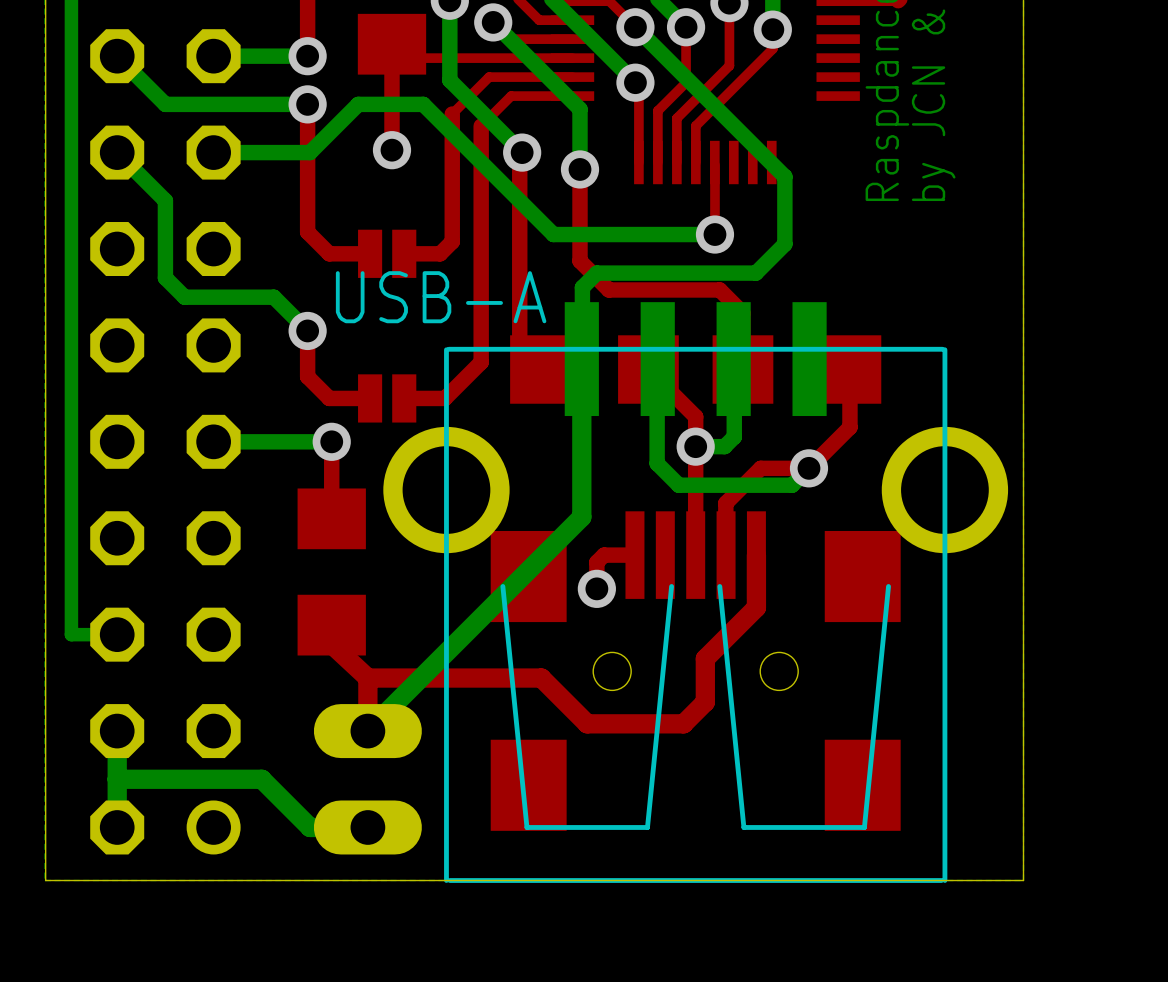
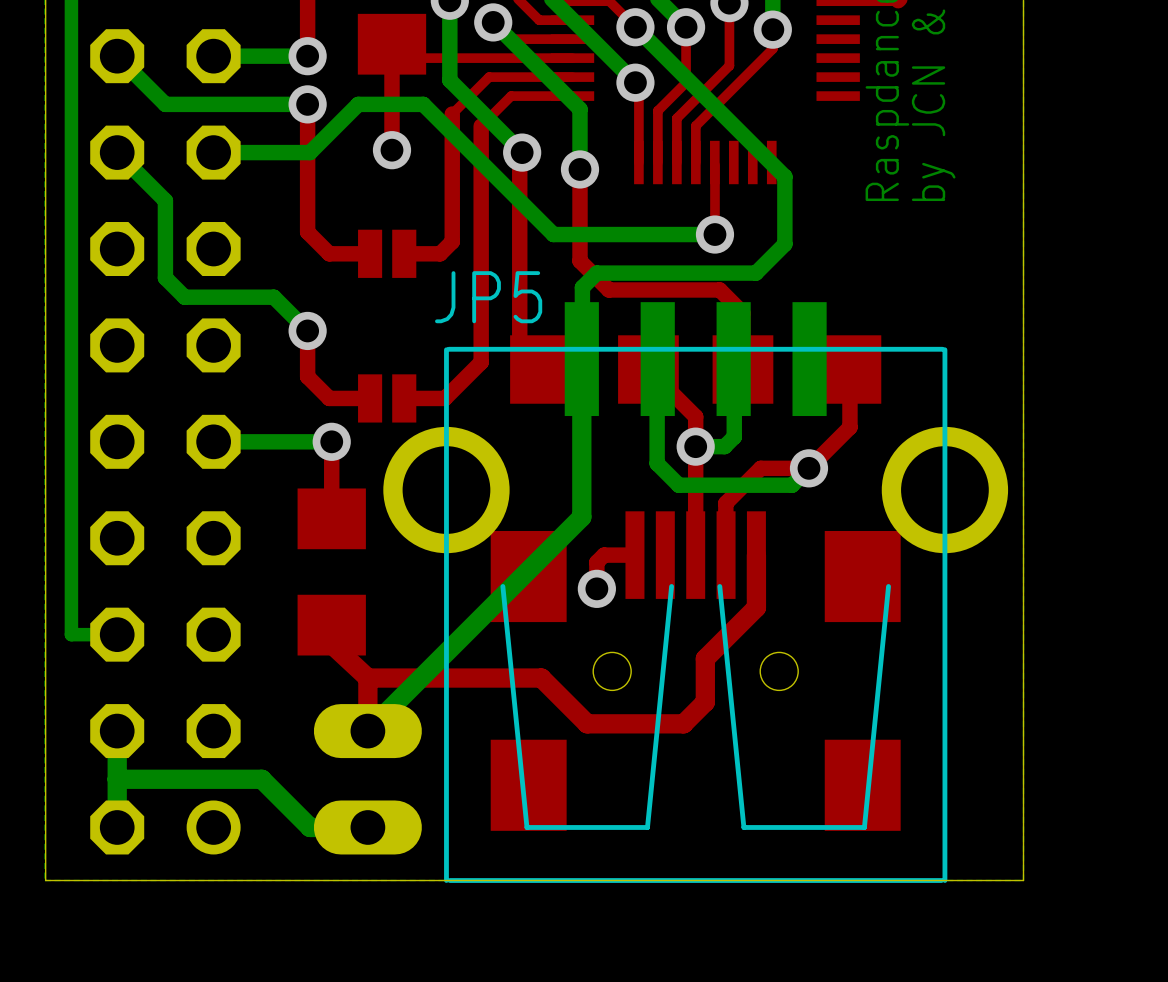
USB-A name: USB-A (441, 297) -> JP5 (488, 297)

